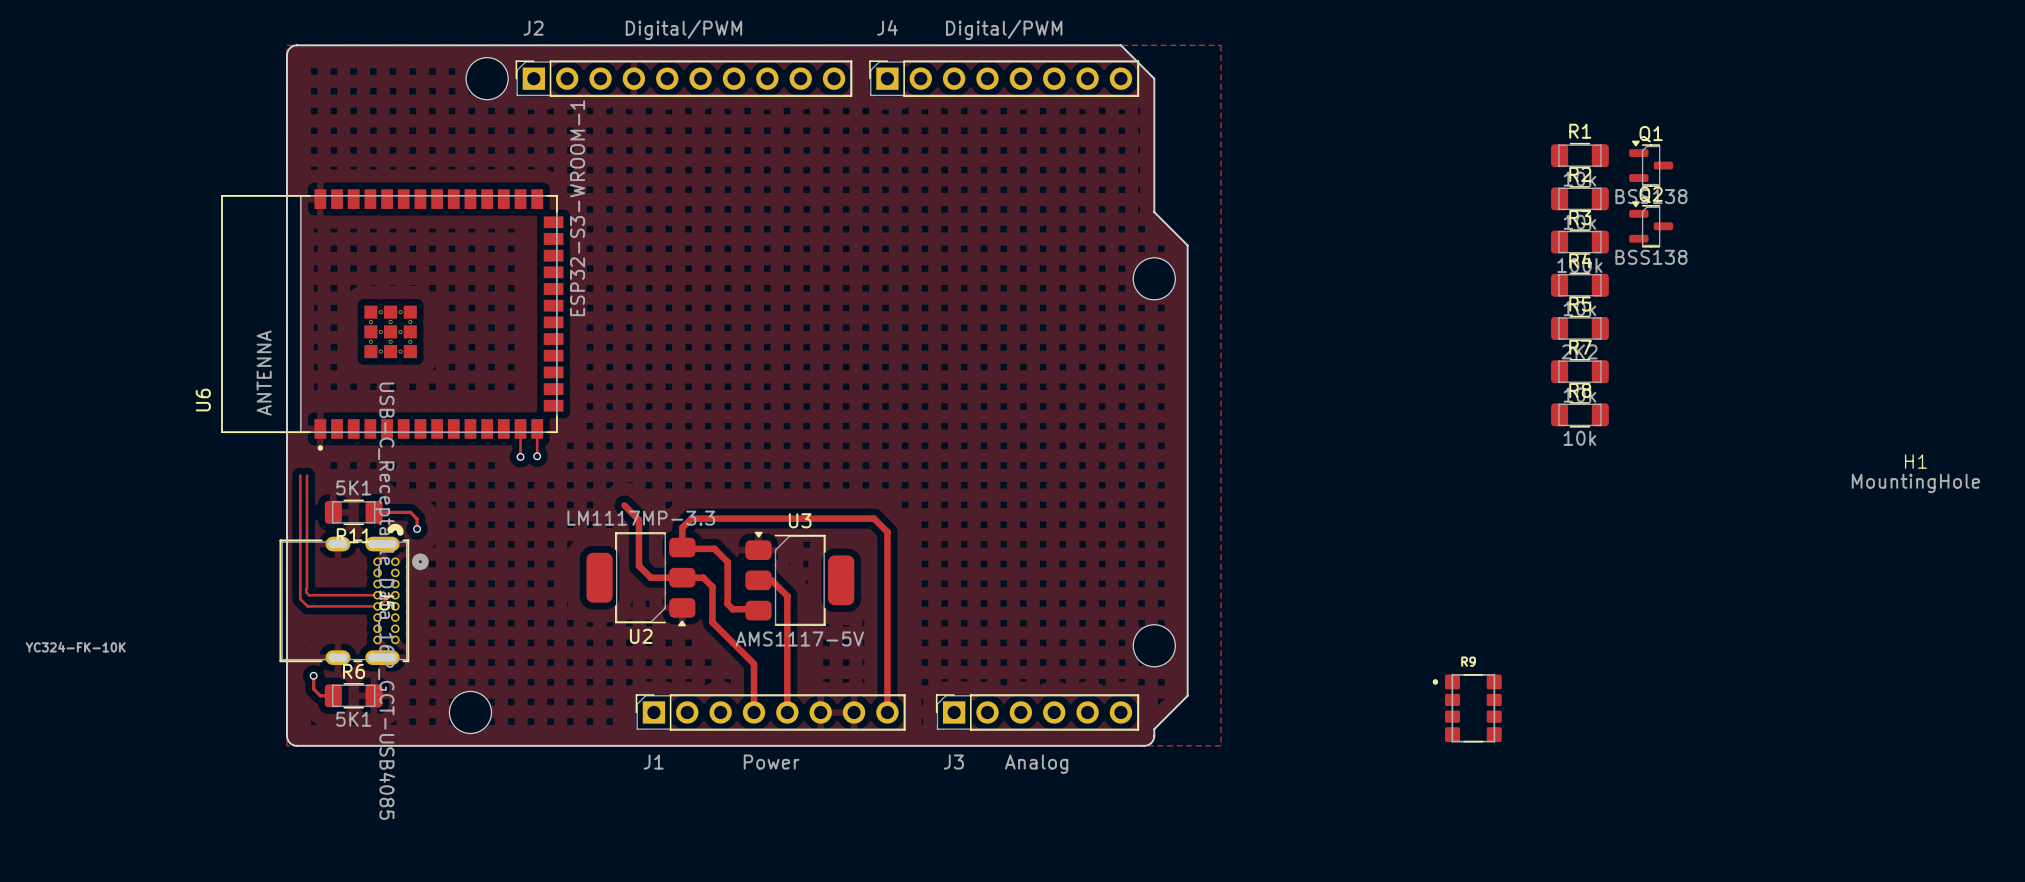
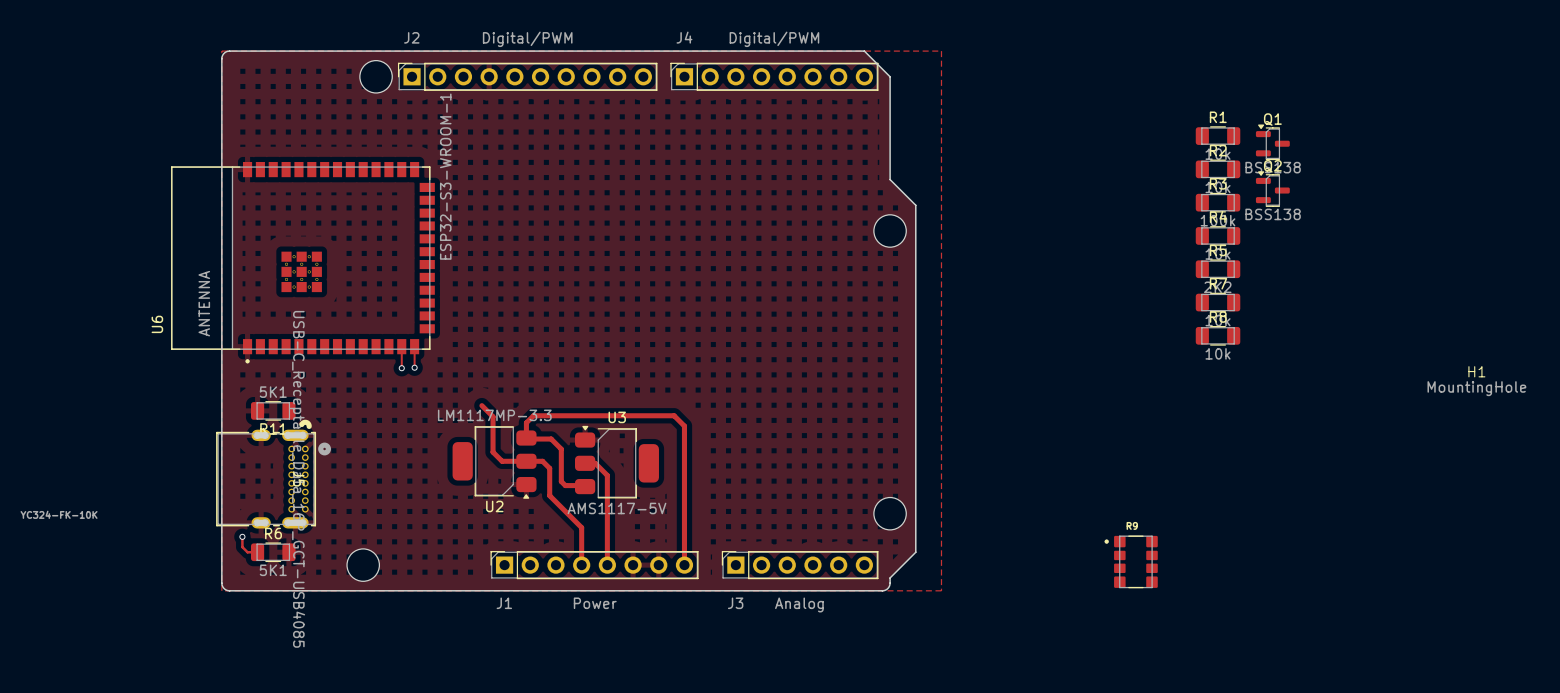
track: (300, 475) (300, 599) (307, 606) (379, 606) (390, 595) (395, 595) -> none
track: (307, 475) (306, 592) (309, 595) (377, 595) -> none
track: (374, 512) (410, 512) (417, 519) (417, 529) -> none
via: (417, 529) -> none

